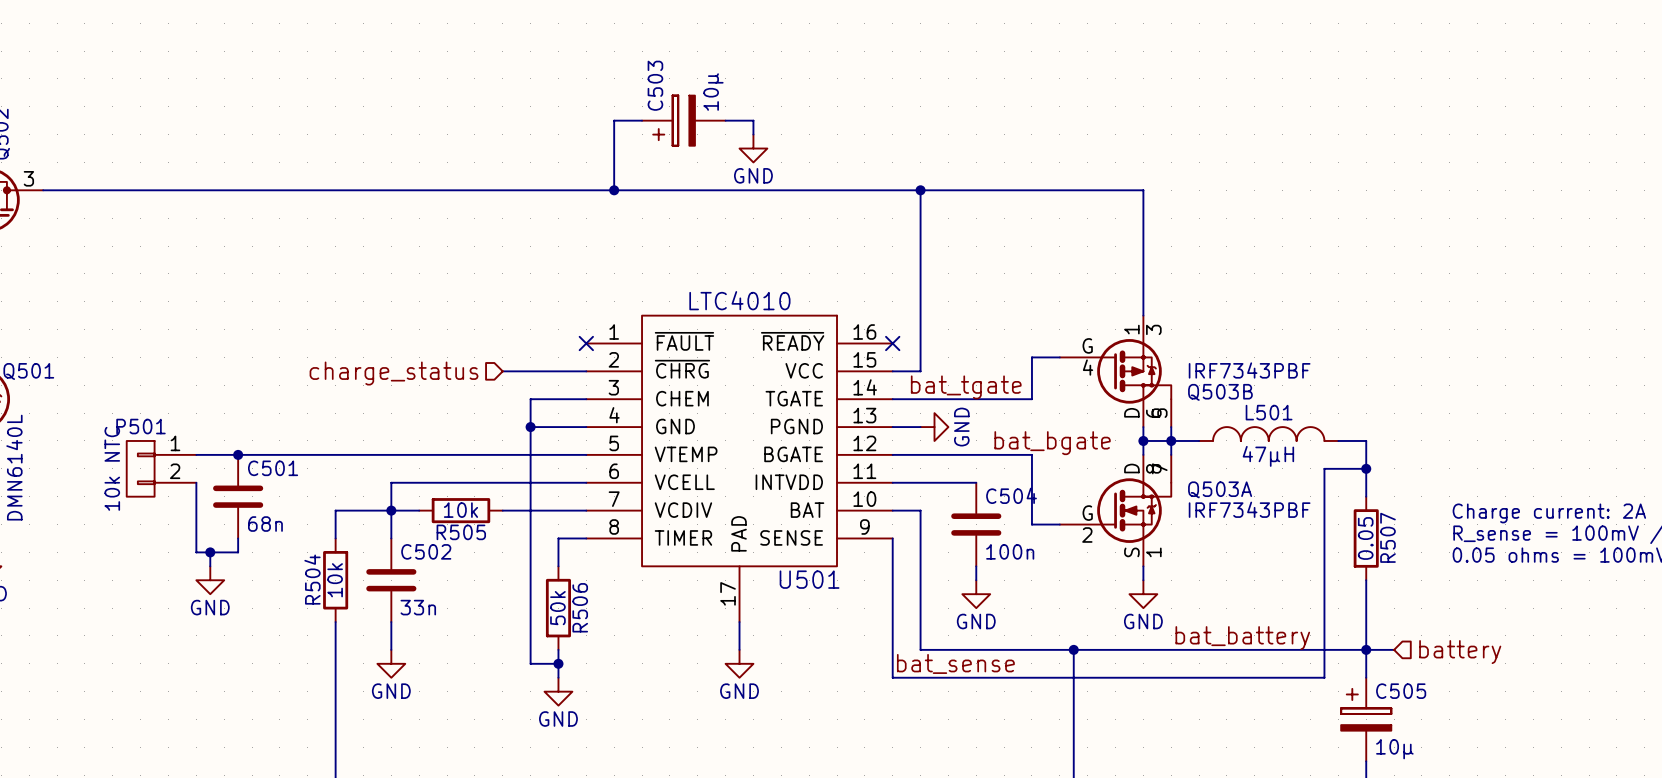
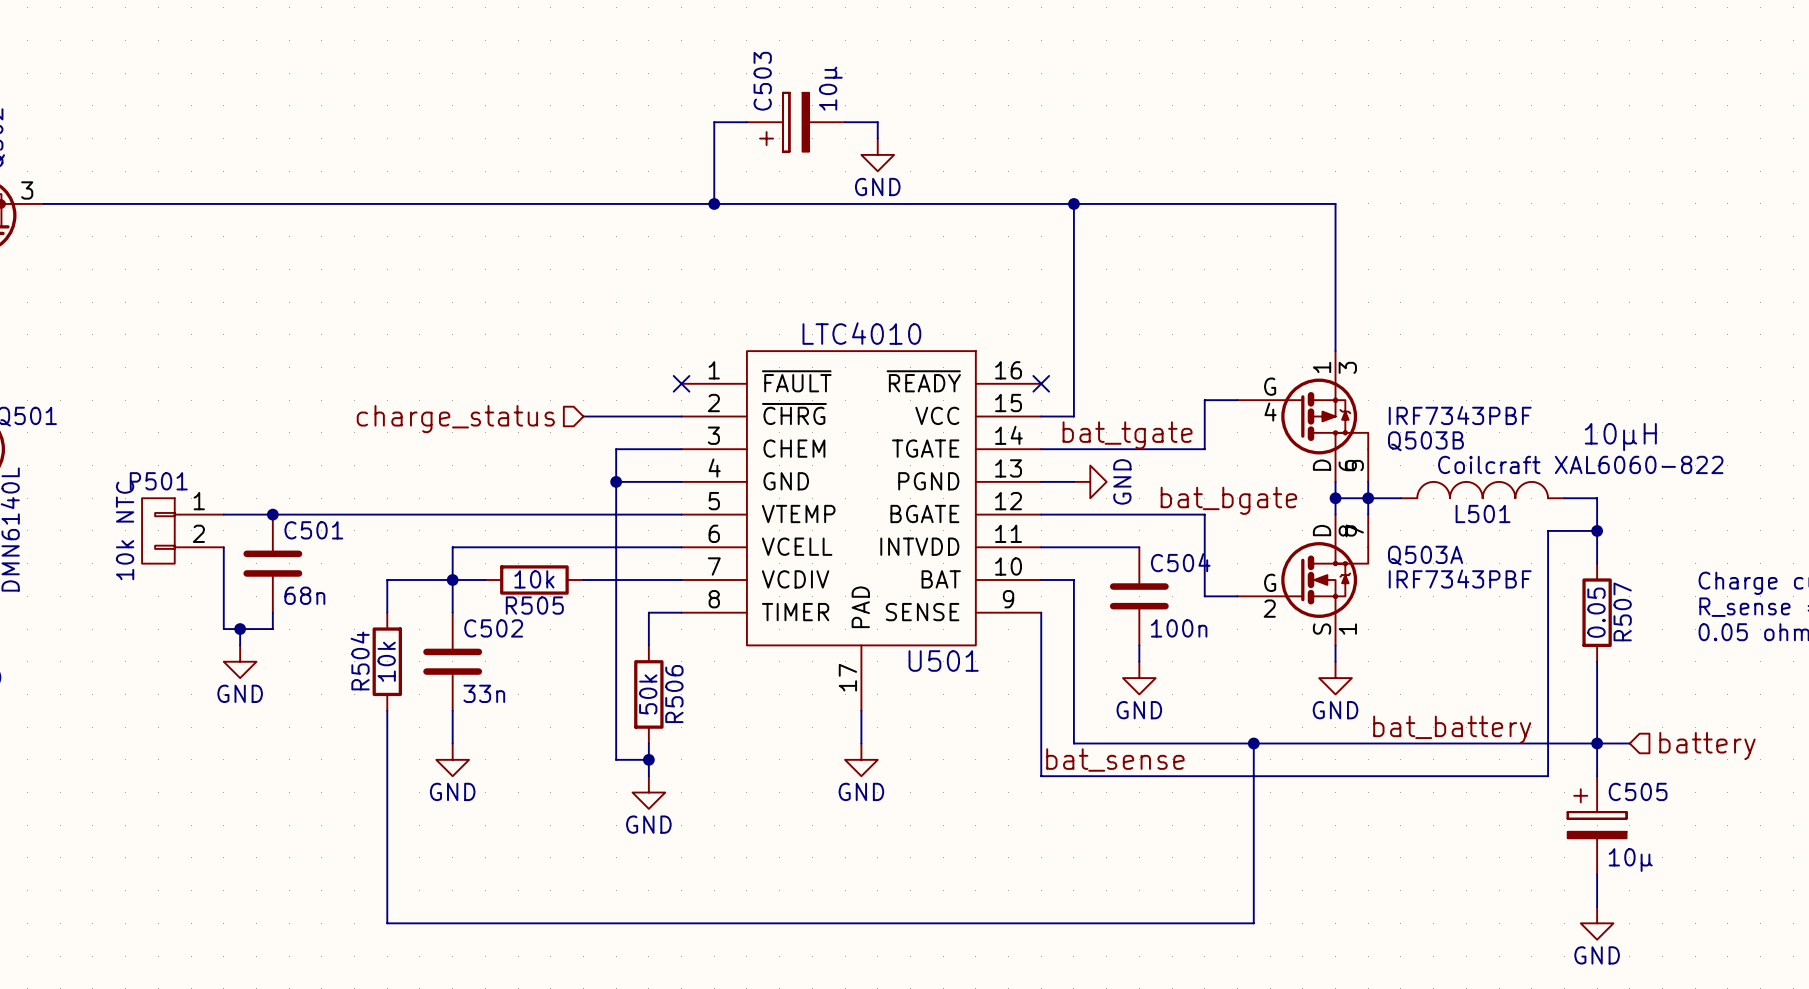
text: none -> 10µH (1620, 437)
L501 name position: L501 (1269, 412) -> L501 (1483, 513)
L501 value: 47µH (1268, 456) -> Coilcraft XAL6060-822 (1580, 464)

